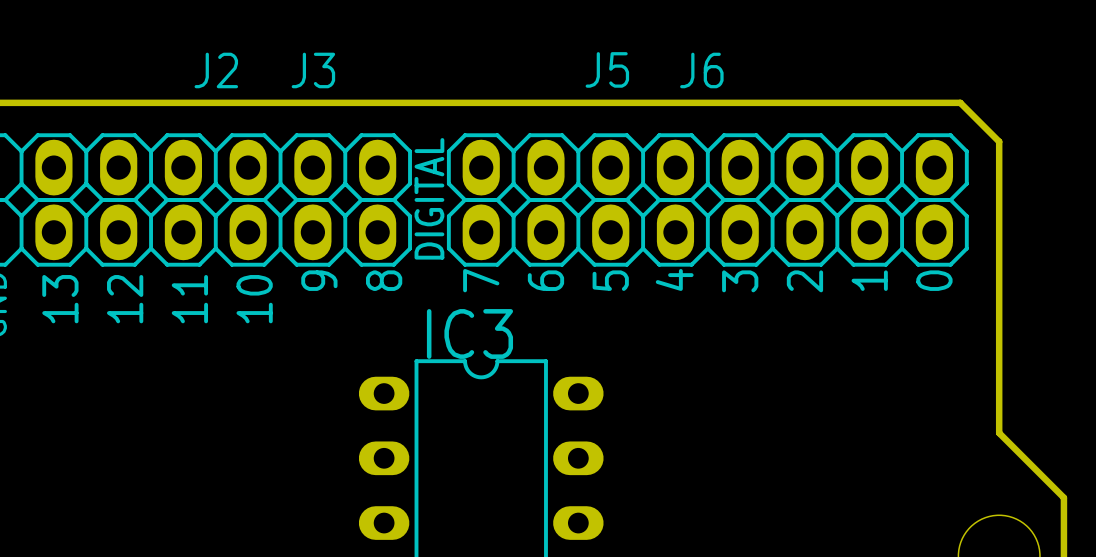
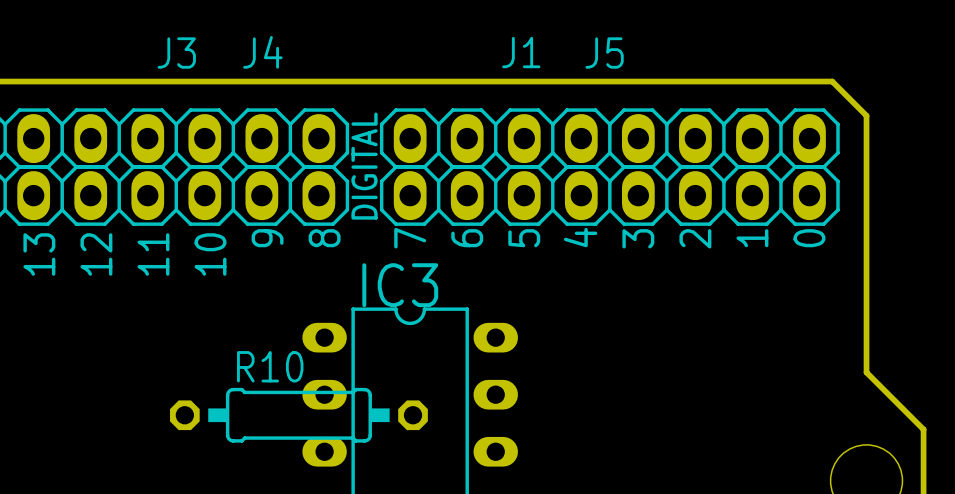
J5 name: J5 (607, 69) -> J1 (521, 52)
J2 name: J2 (216, 70) -> J3 (176, 53)
J3 name: J3 (313, 70) -> J4 (262, 52)
J6 name: J6 (701, 70) -> J5 (604, 53)
R10: none -> (298, 415)

